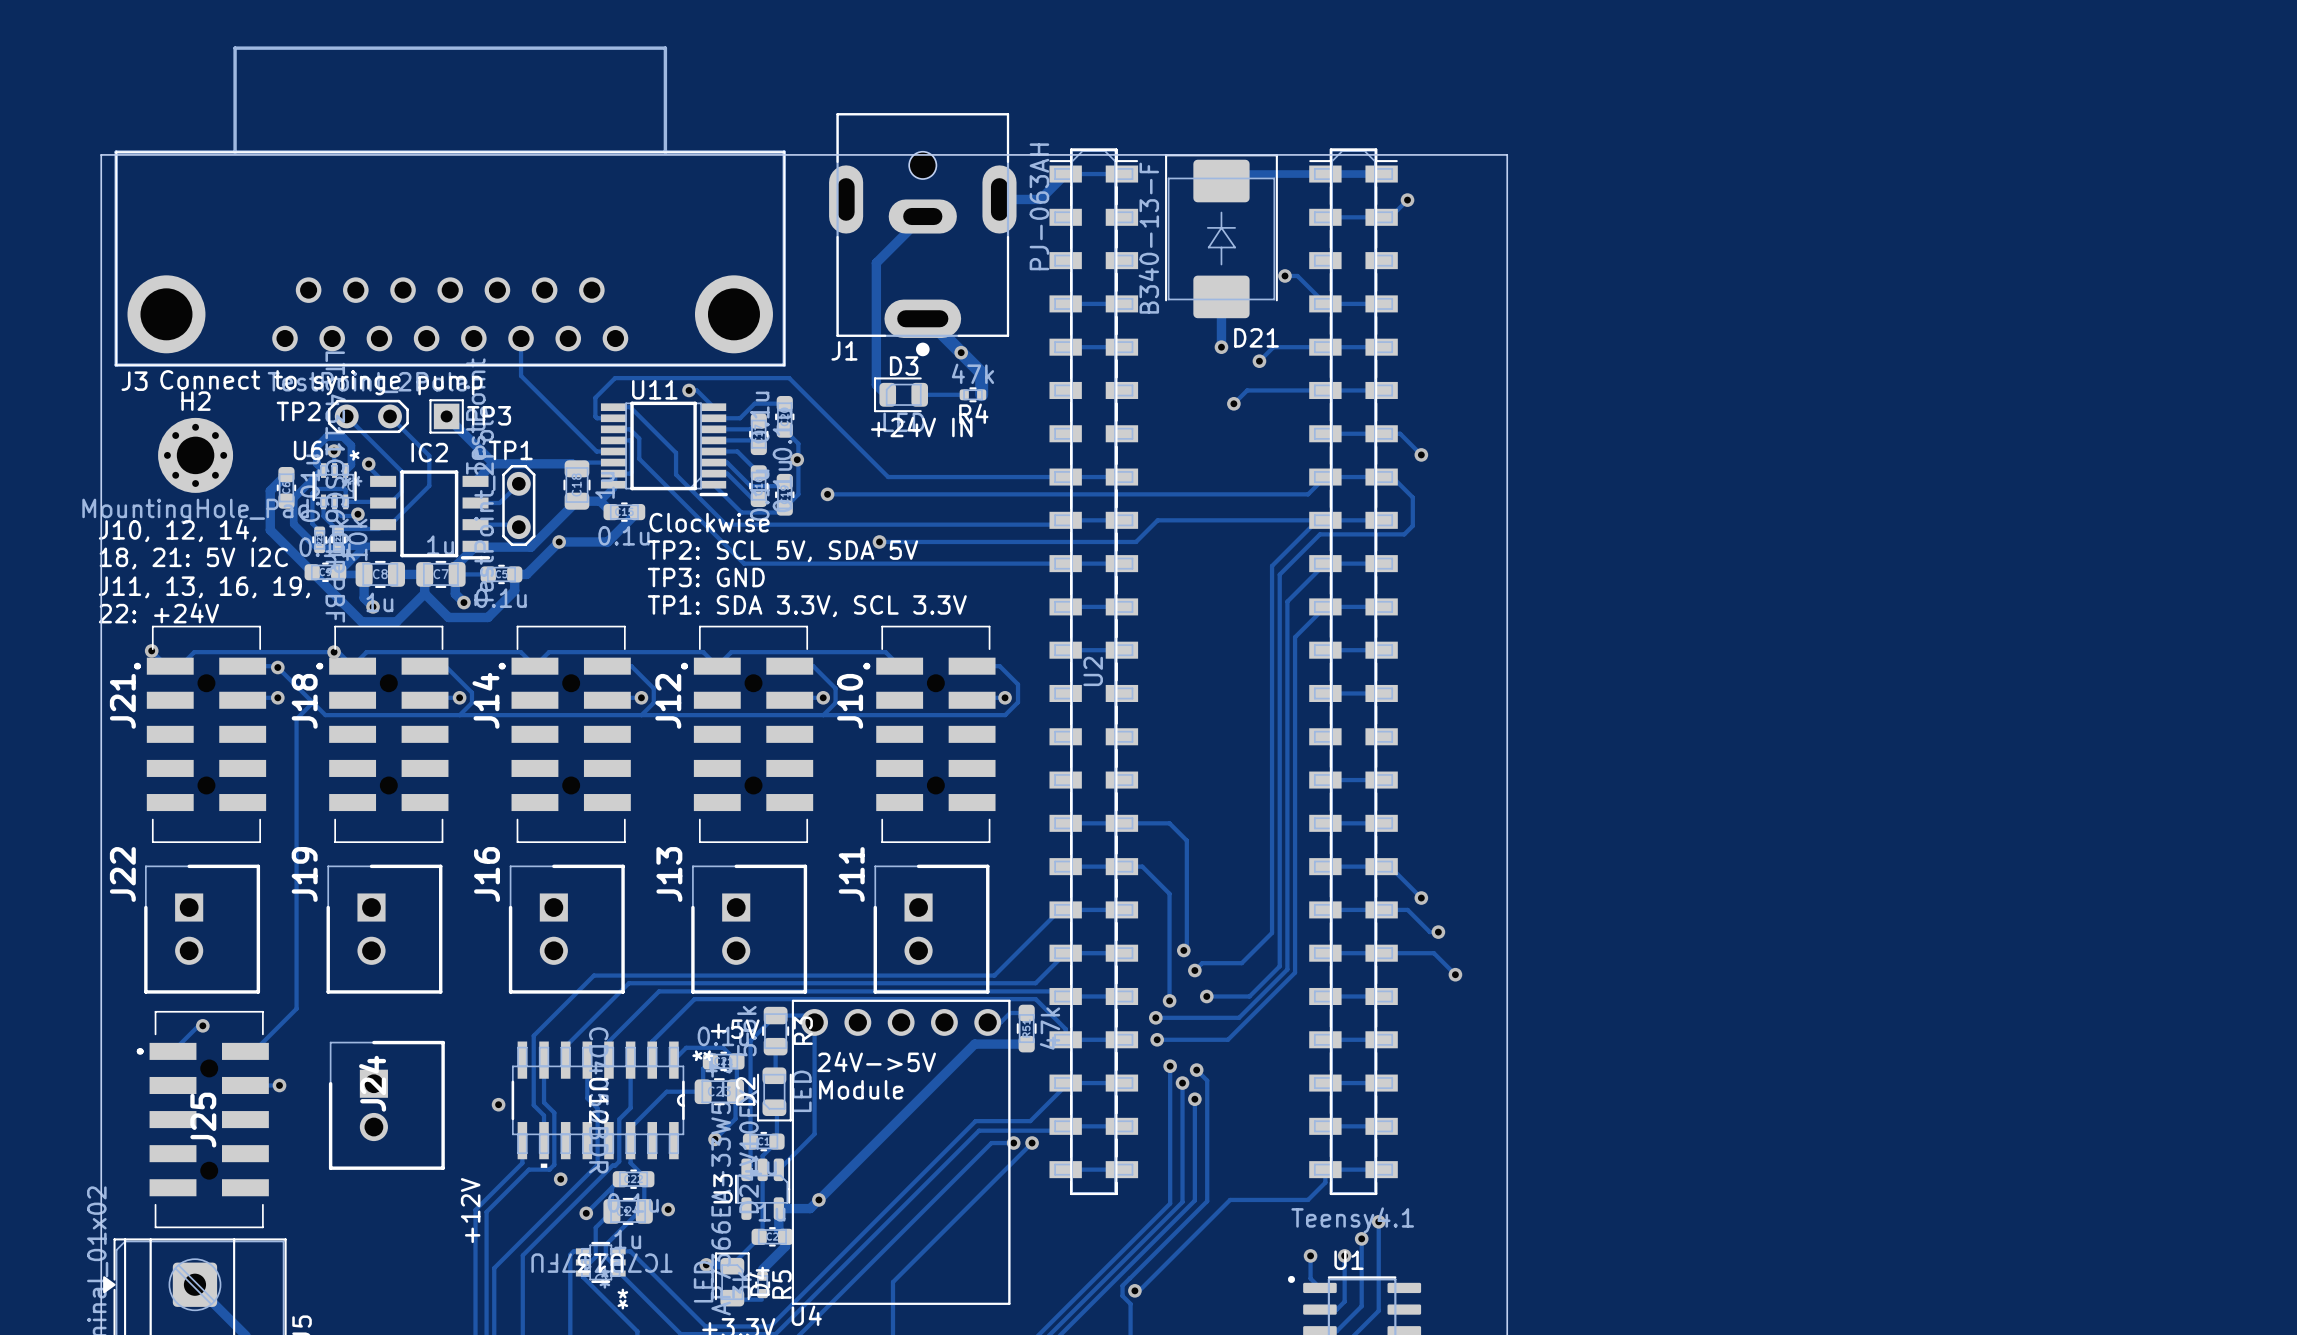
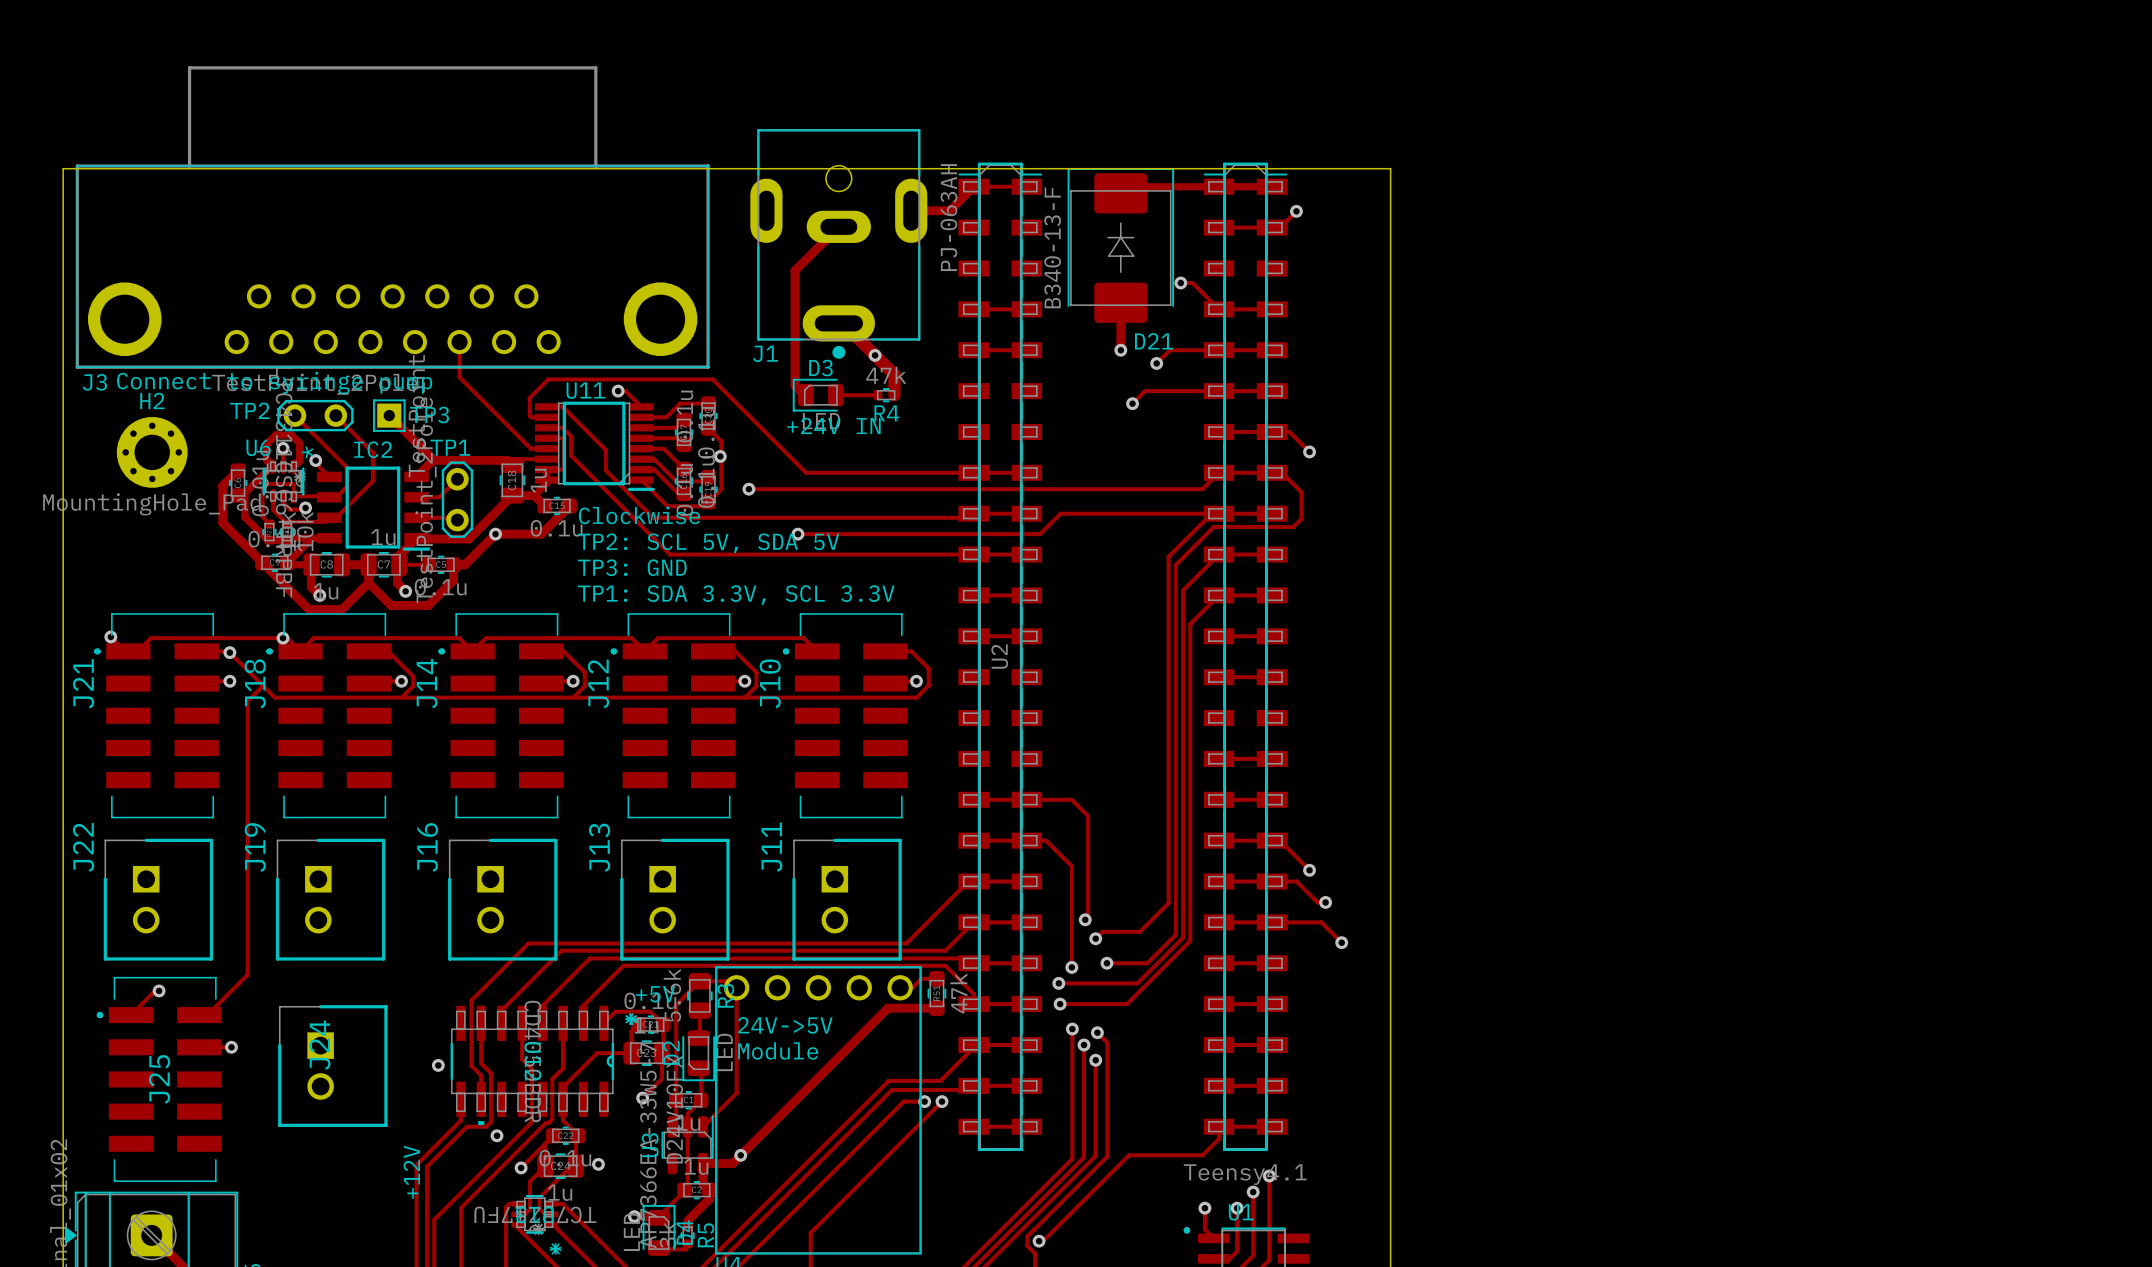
text: J10, 12, 14, (177, 530) -> none
text: 18, 21: 5V I2C (193, 558) -> none
text: J11, 13, 16, 19, (204, 587) -> none
text: 22: +24V (158, 613) -> none

